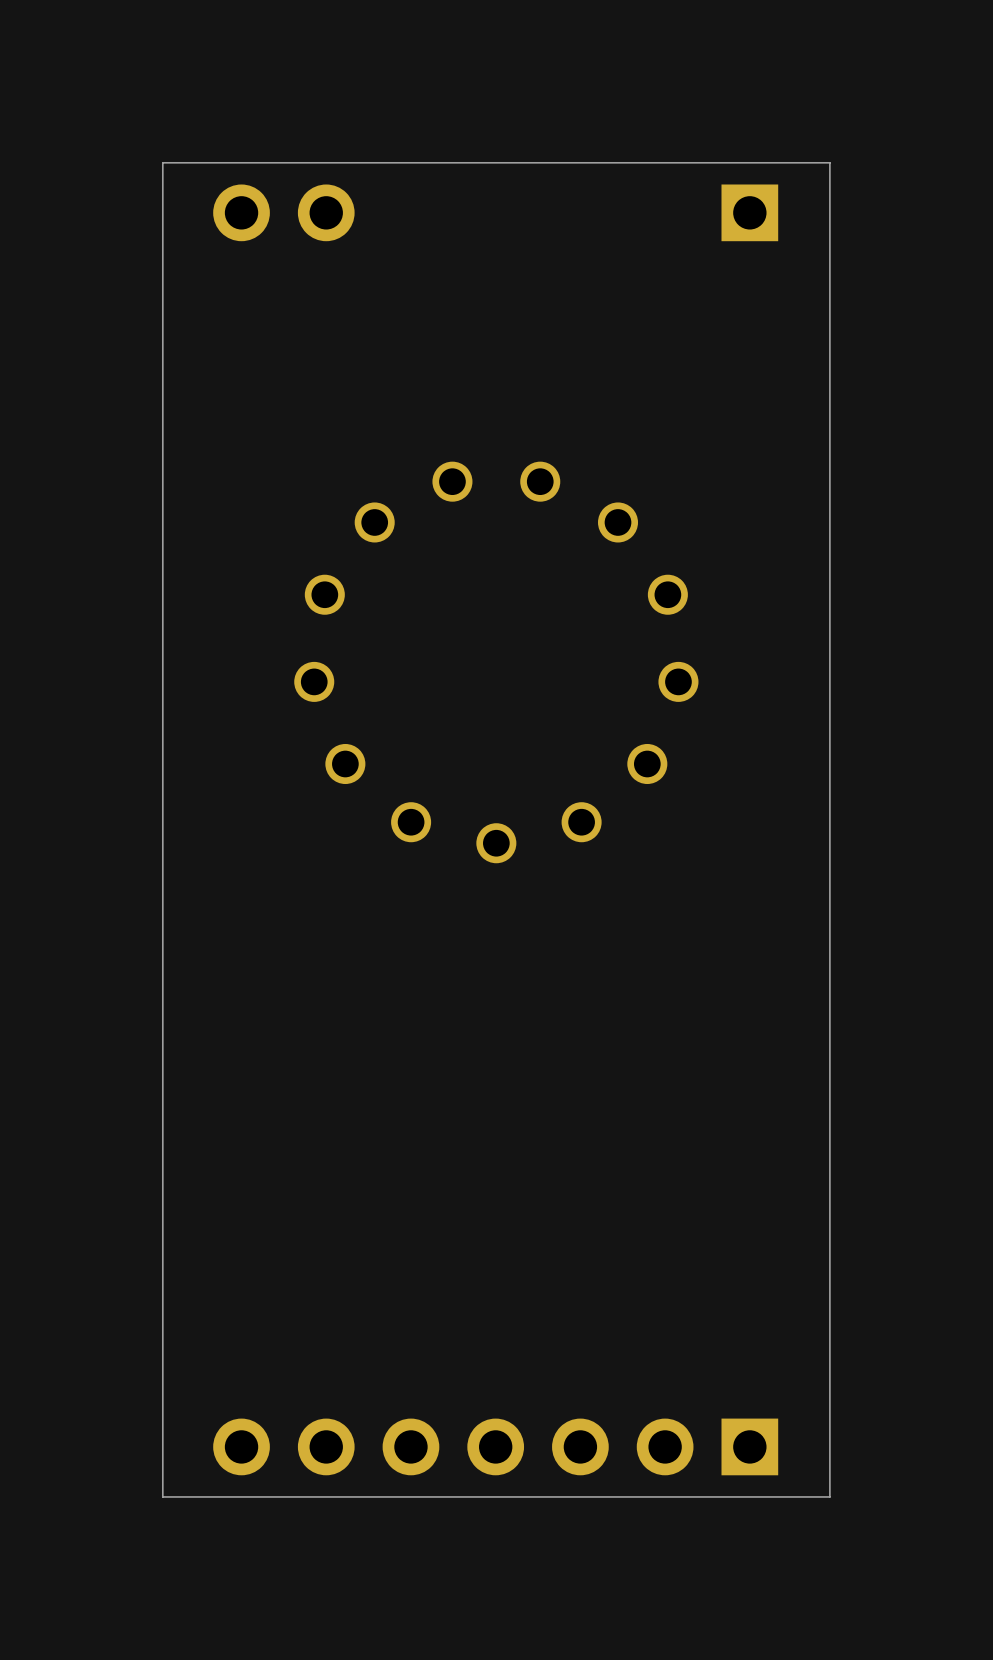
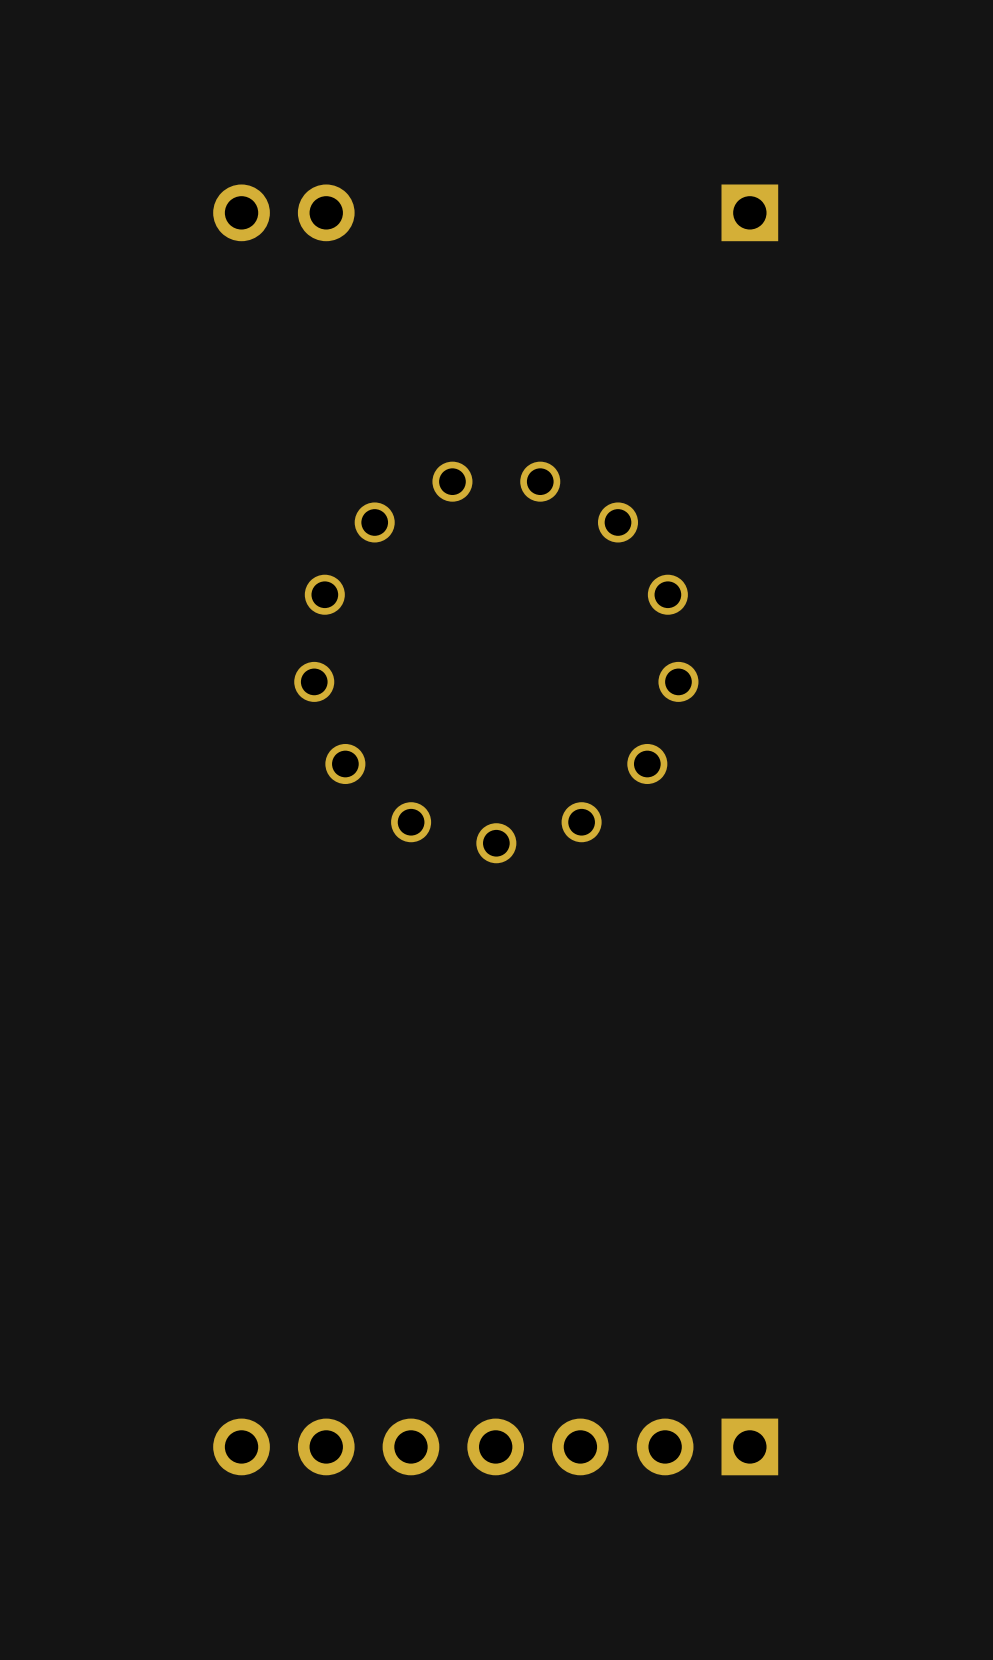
board edge: (829, 162) (829, 1496) (162, 1496) (162, 162) (829, 162) -> none

